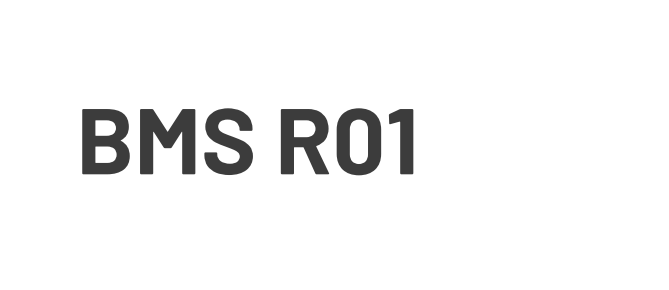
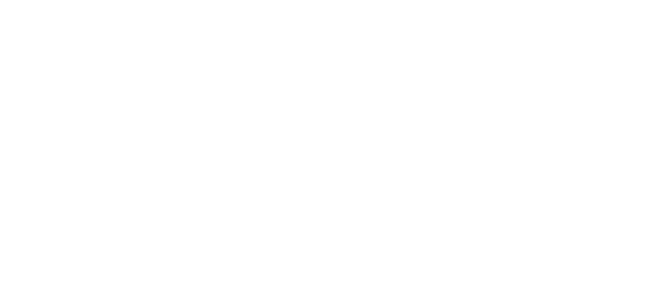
text: BMS R01 (247, 141) -> none

